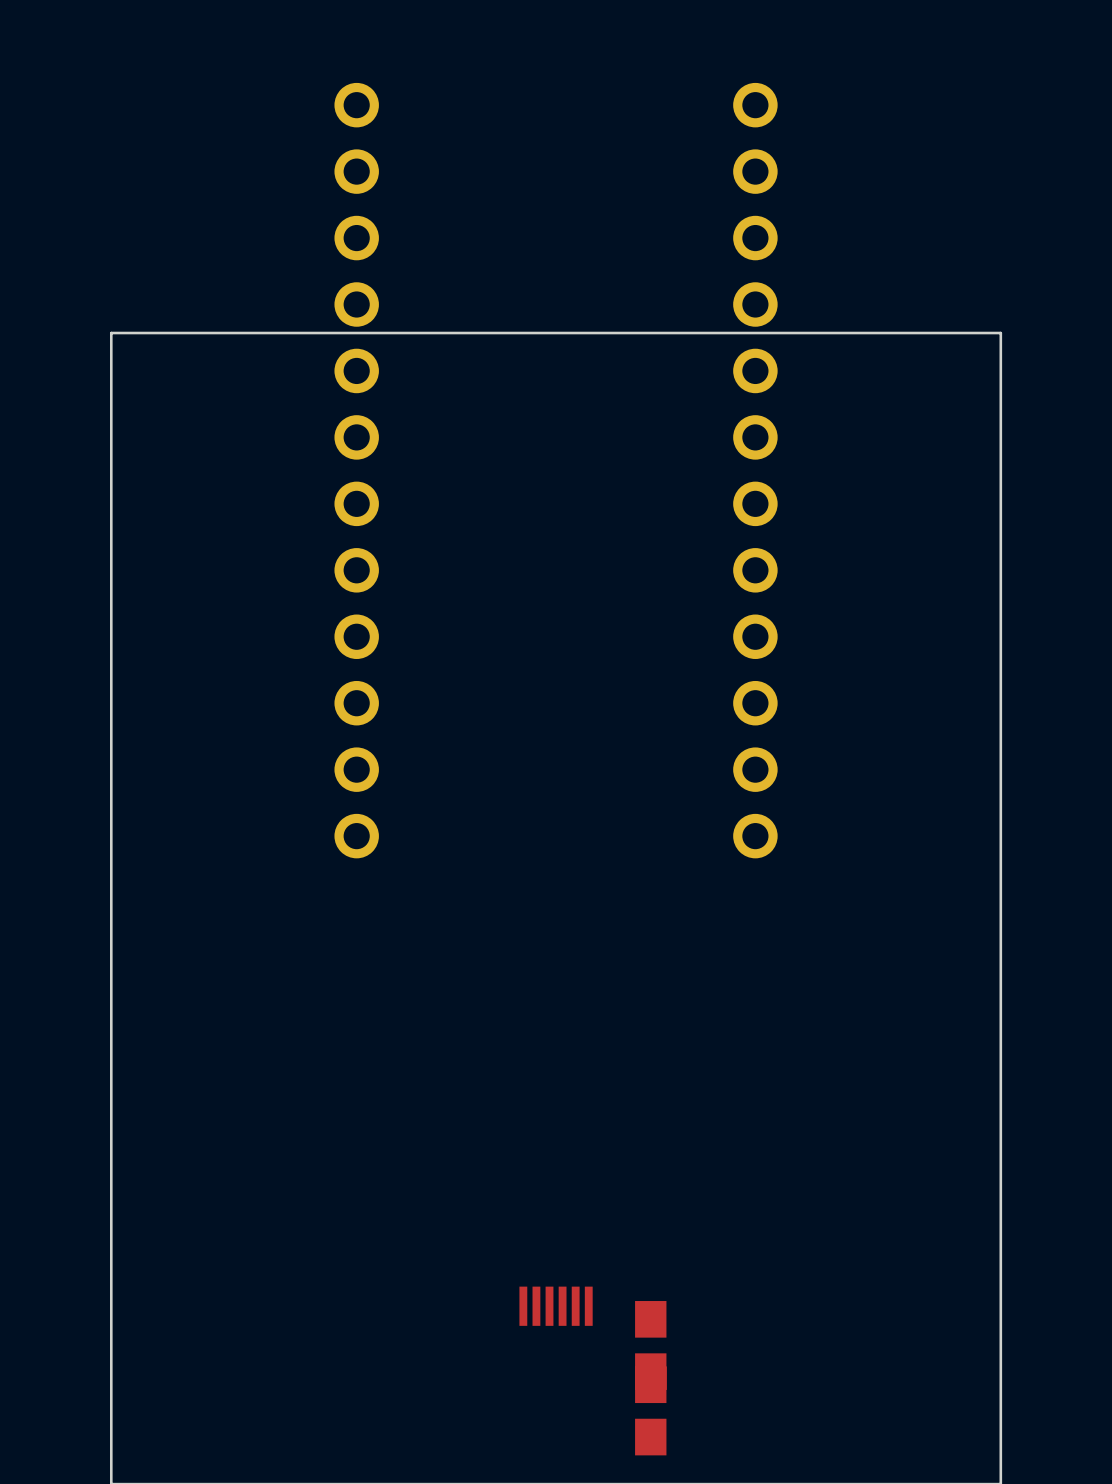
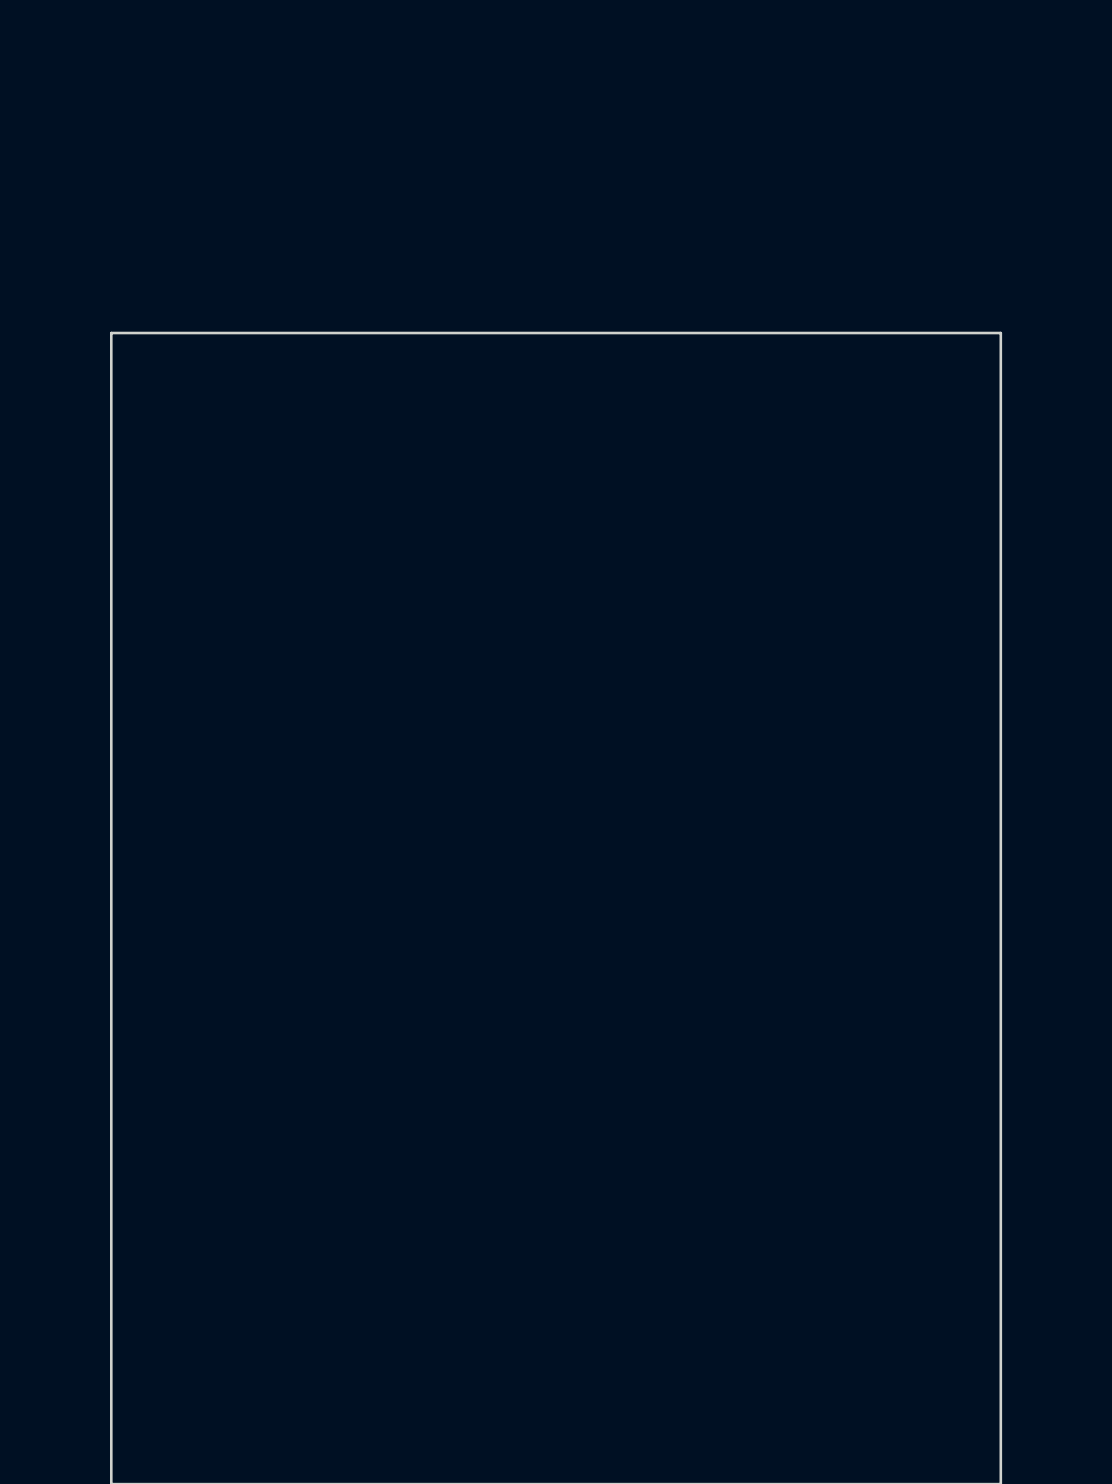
part: (356, 470) -> none
part: (755, 470) -> none
part: (556, 1306) -> none
part: (650, 1345) -> none
part: (650, 1410) -> none

